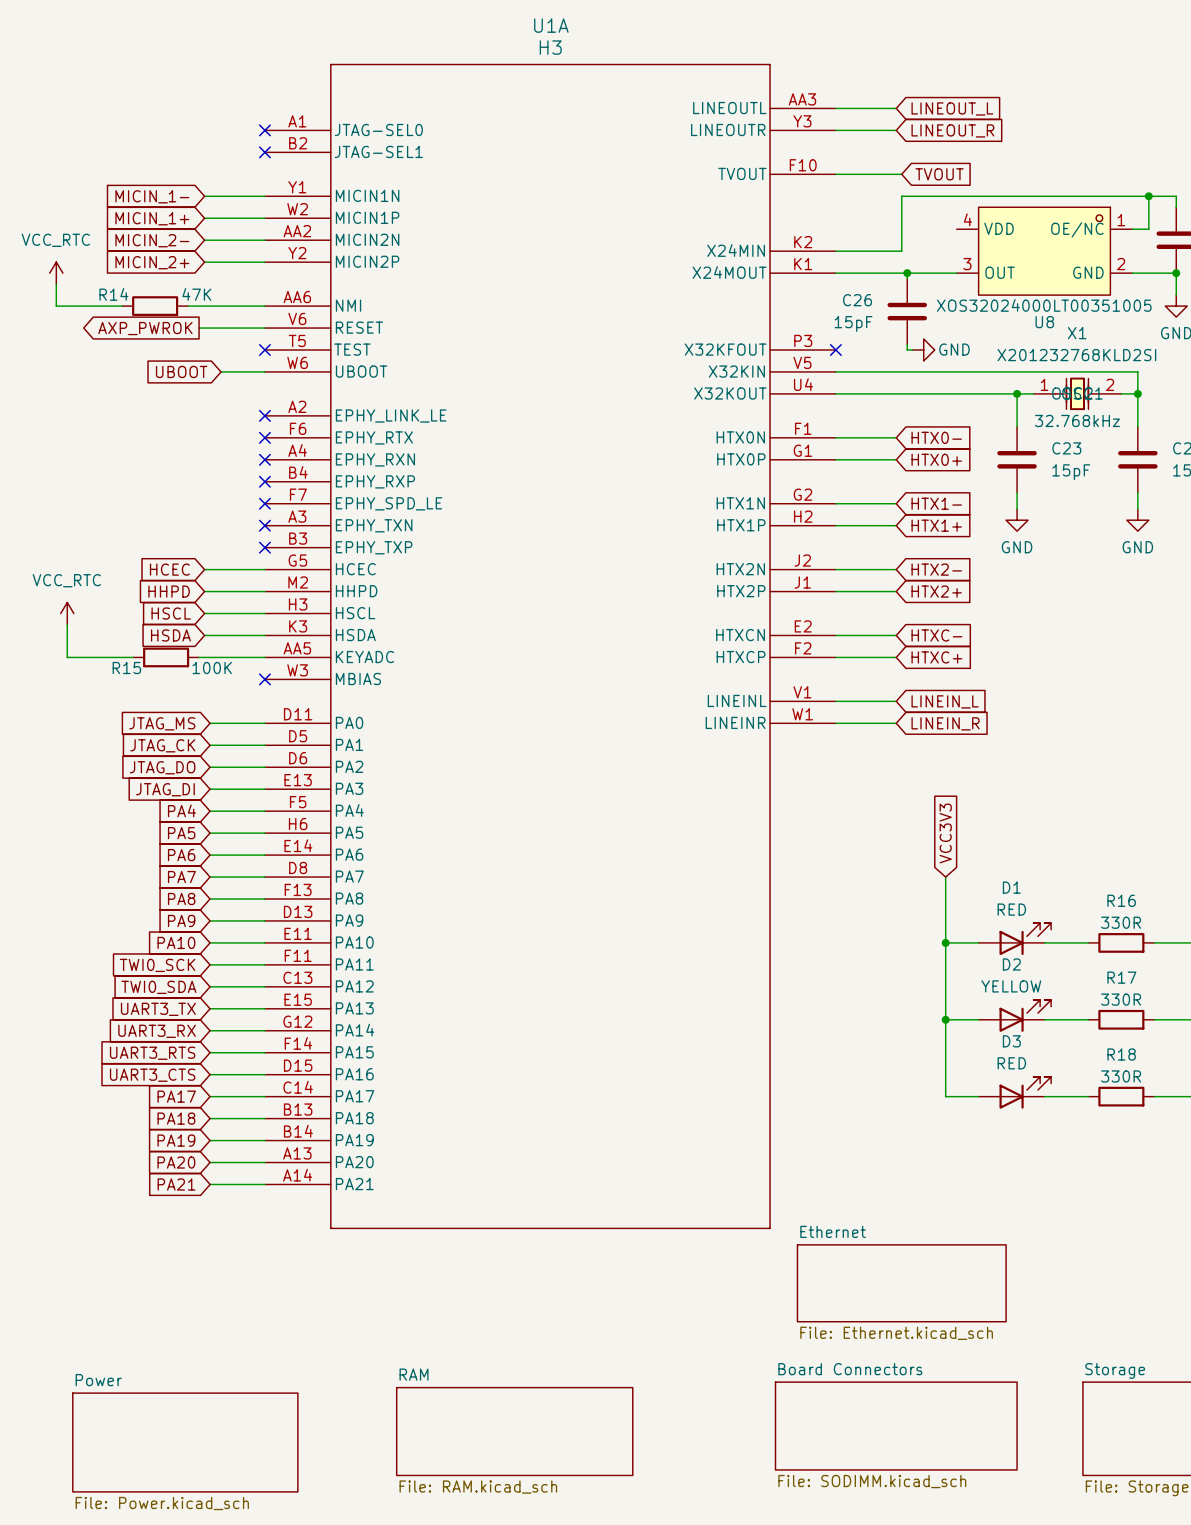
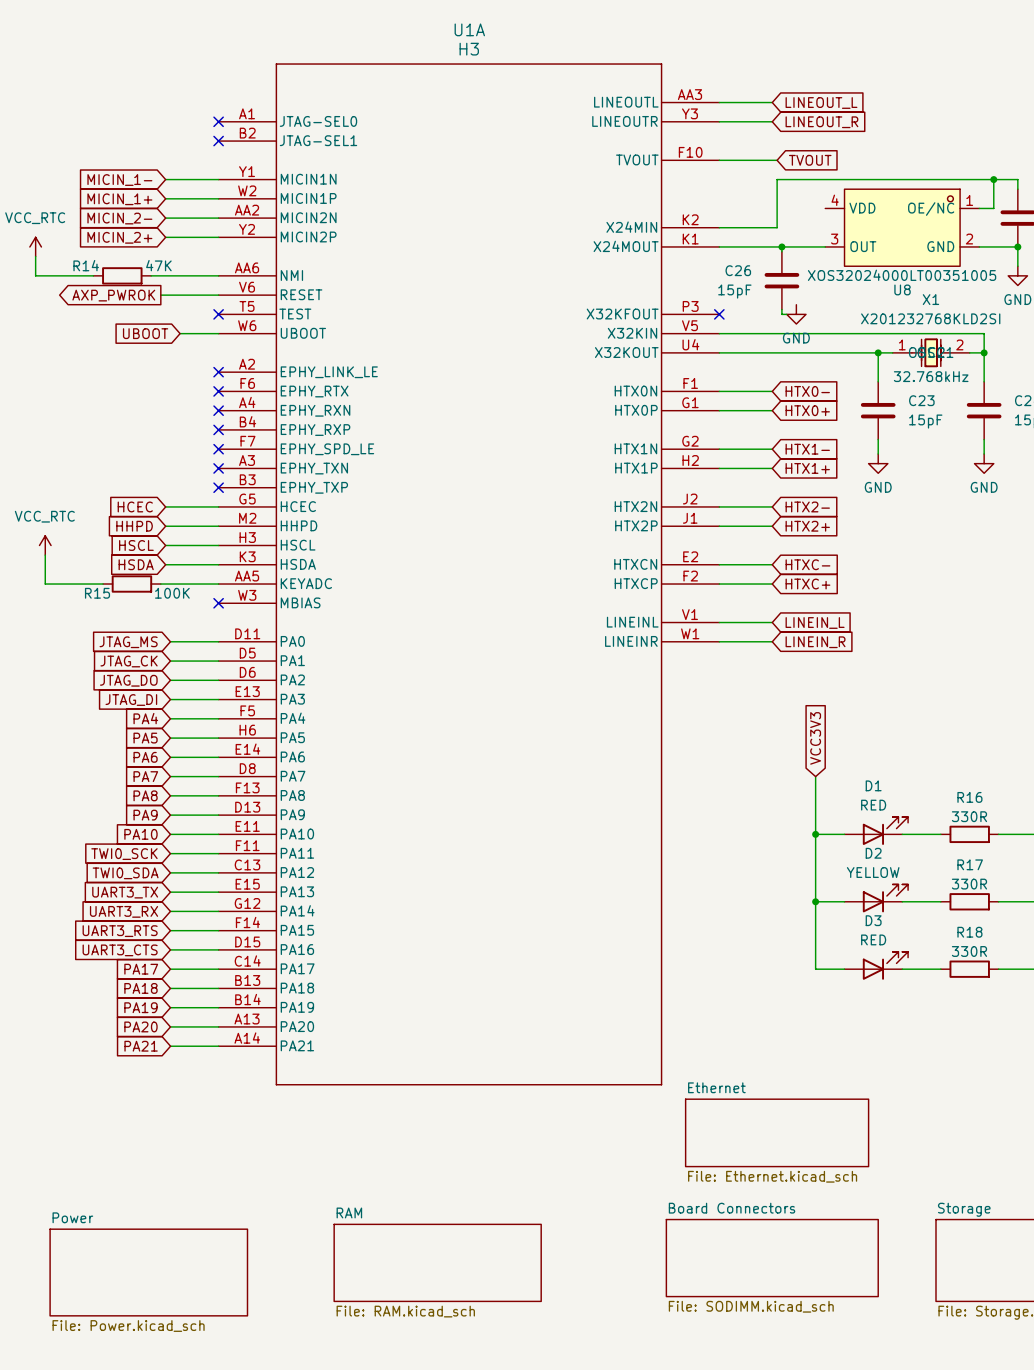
power symbol rotation: 0° (923, 350) -> 90° clockwise (796, 314)

